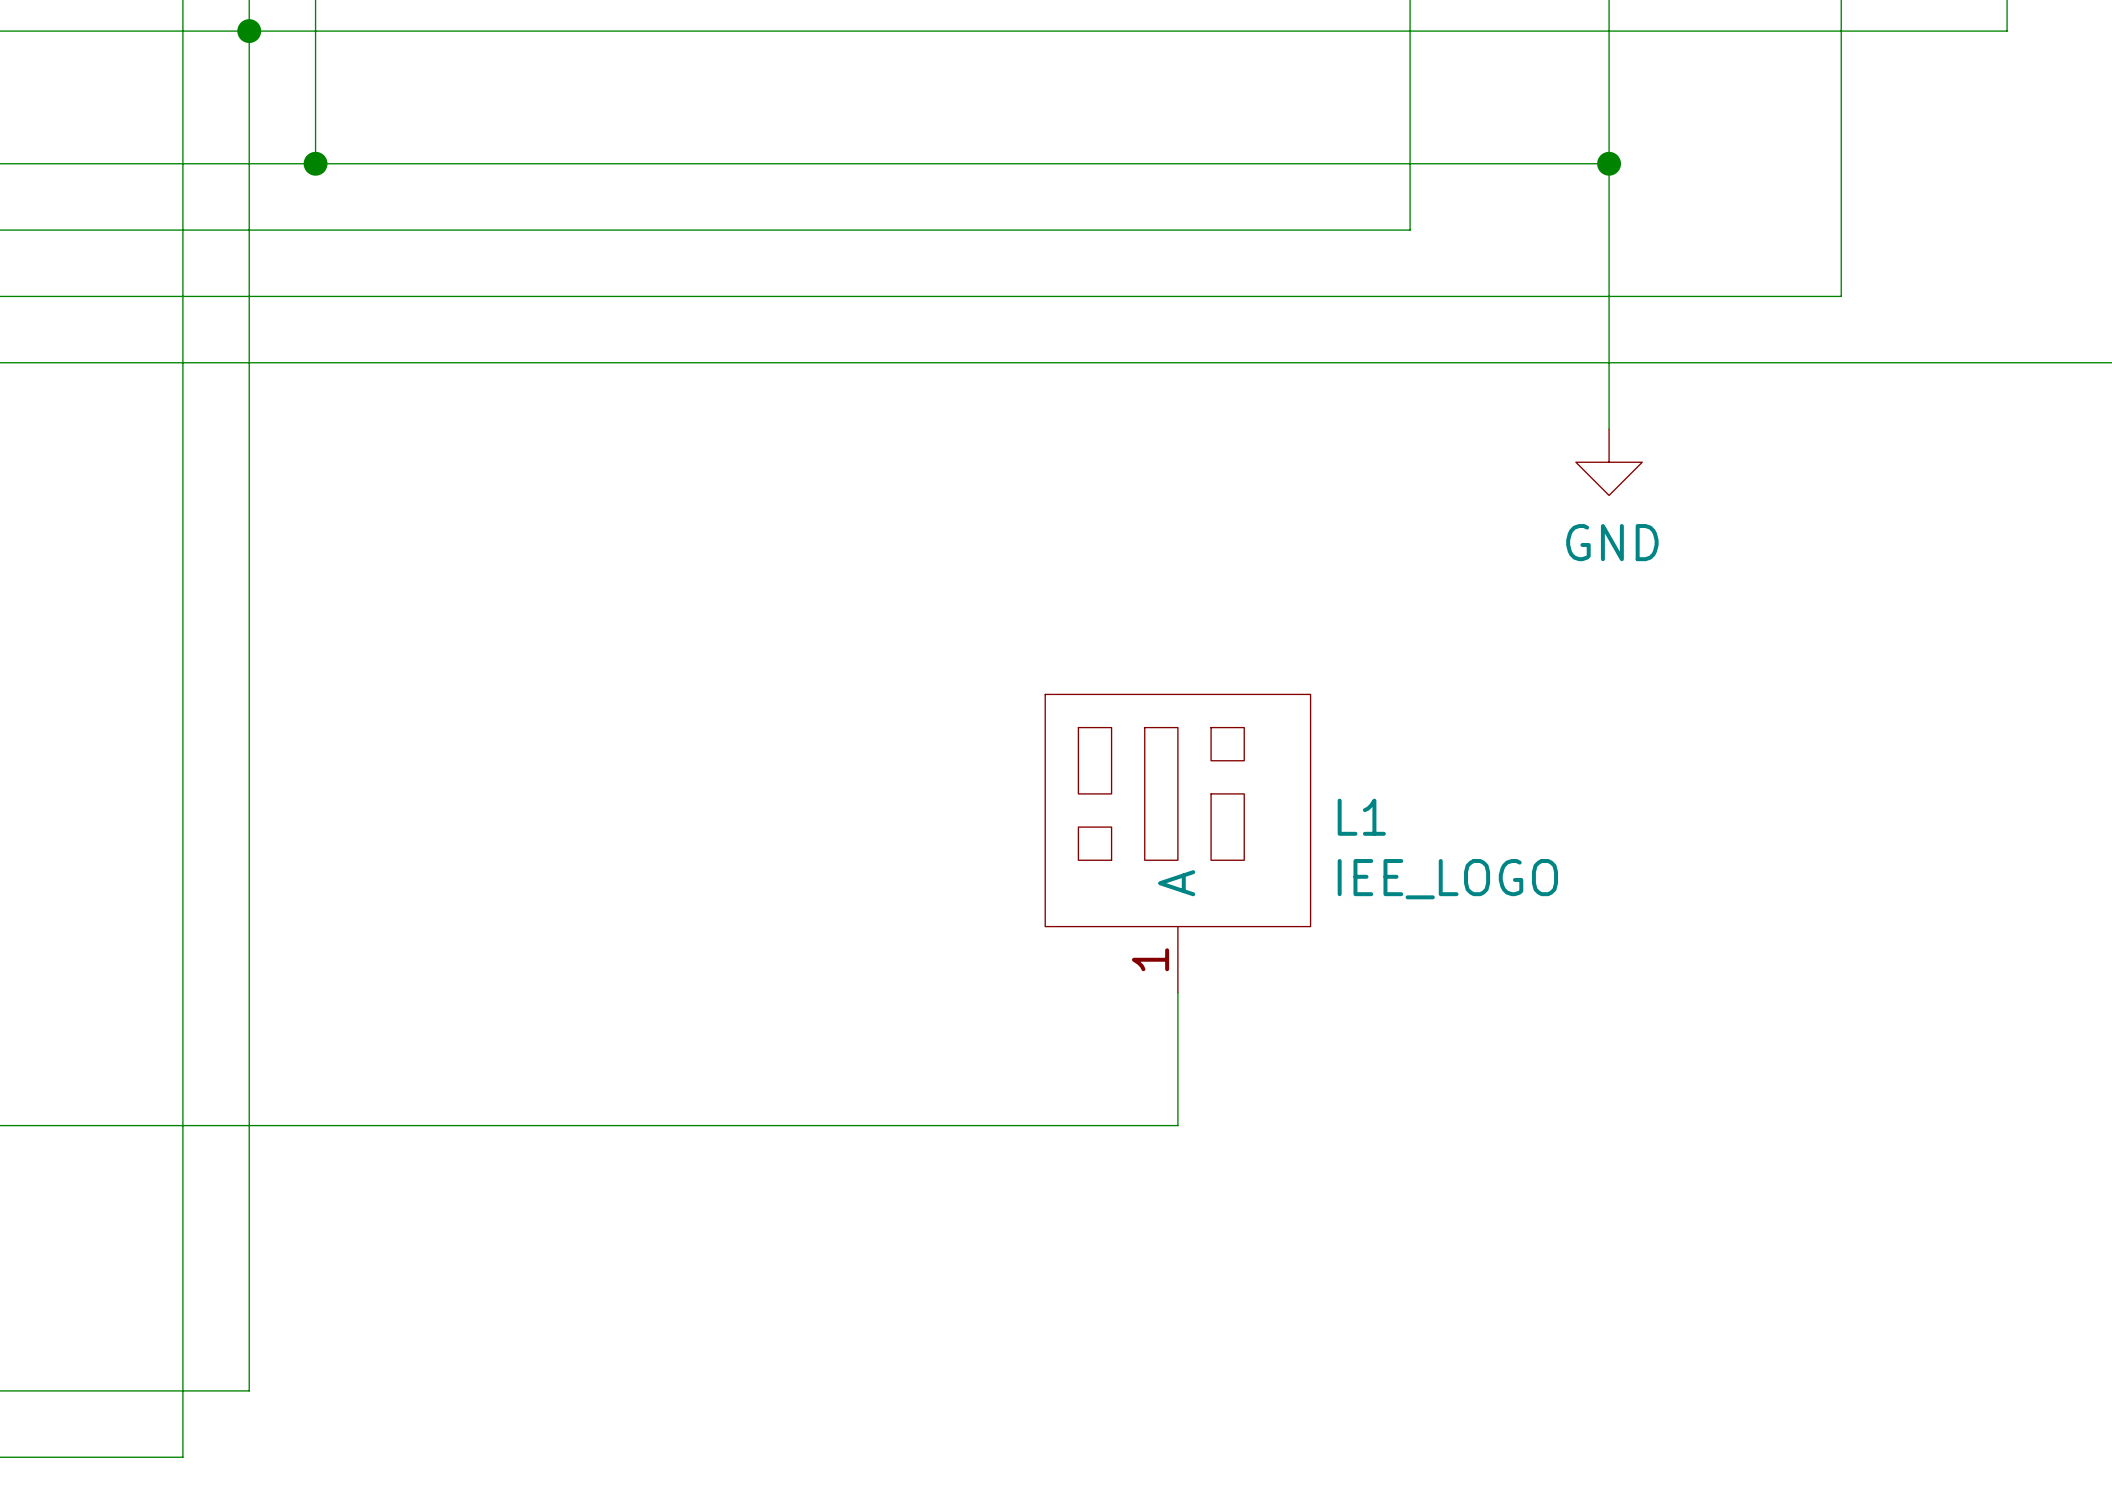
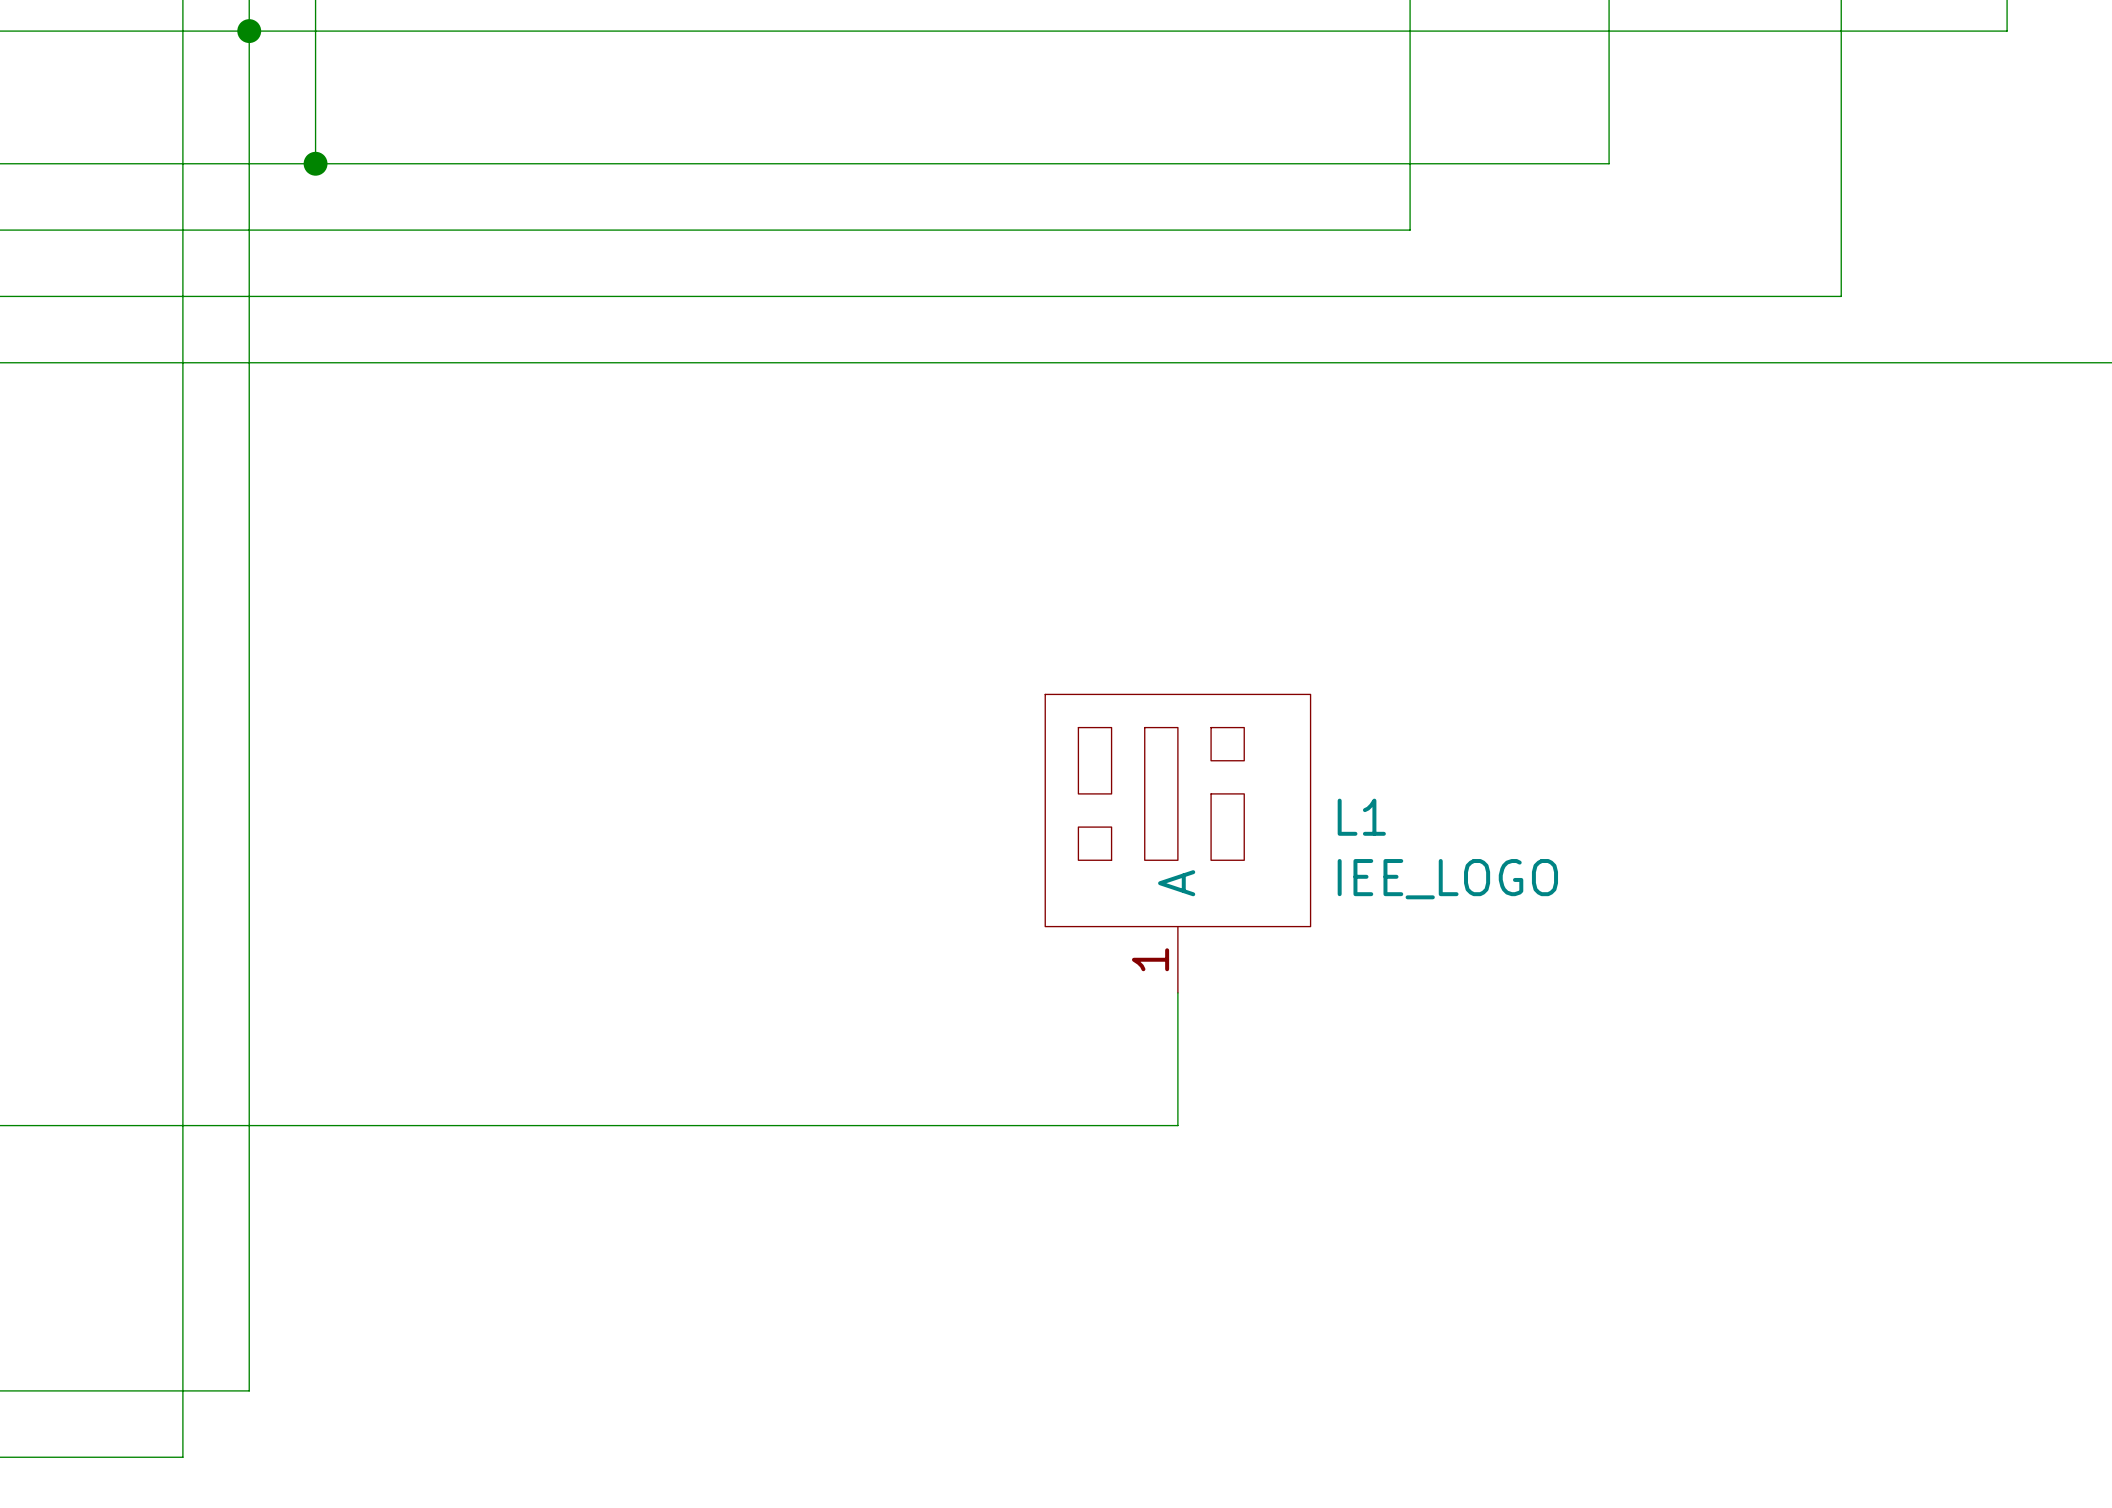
wire: (1609, 163) (1609, 429) -> none
junction: (1609, 163) -> none
power symbol: GND (1609, 462) -> none

